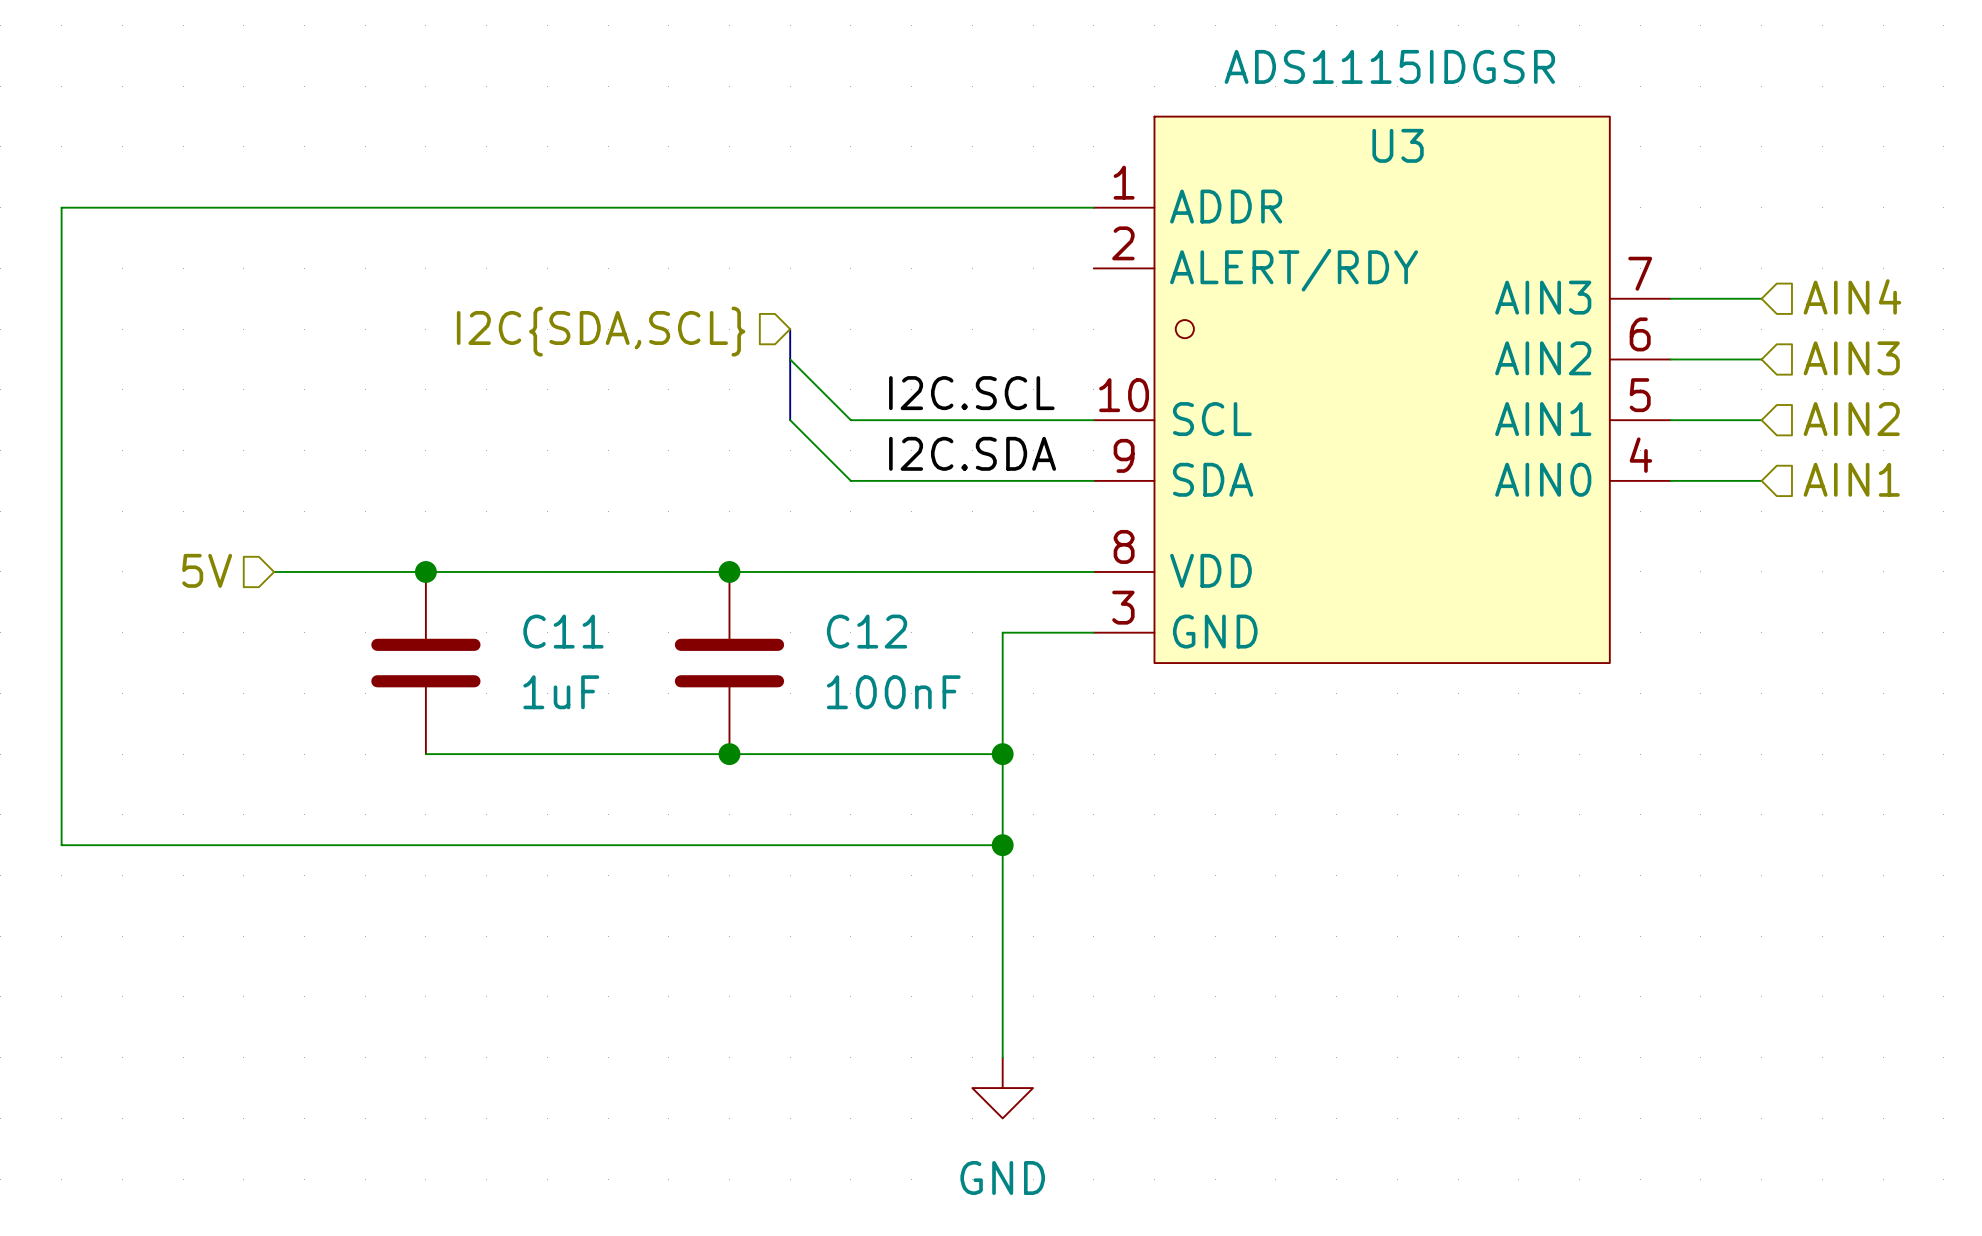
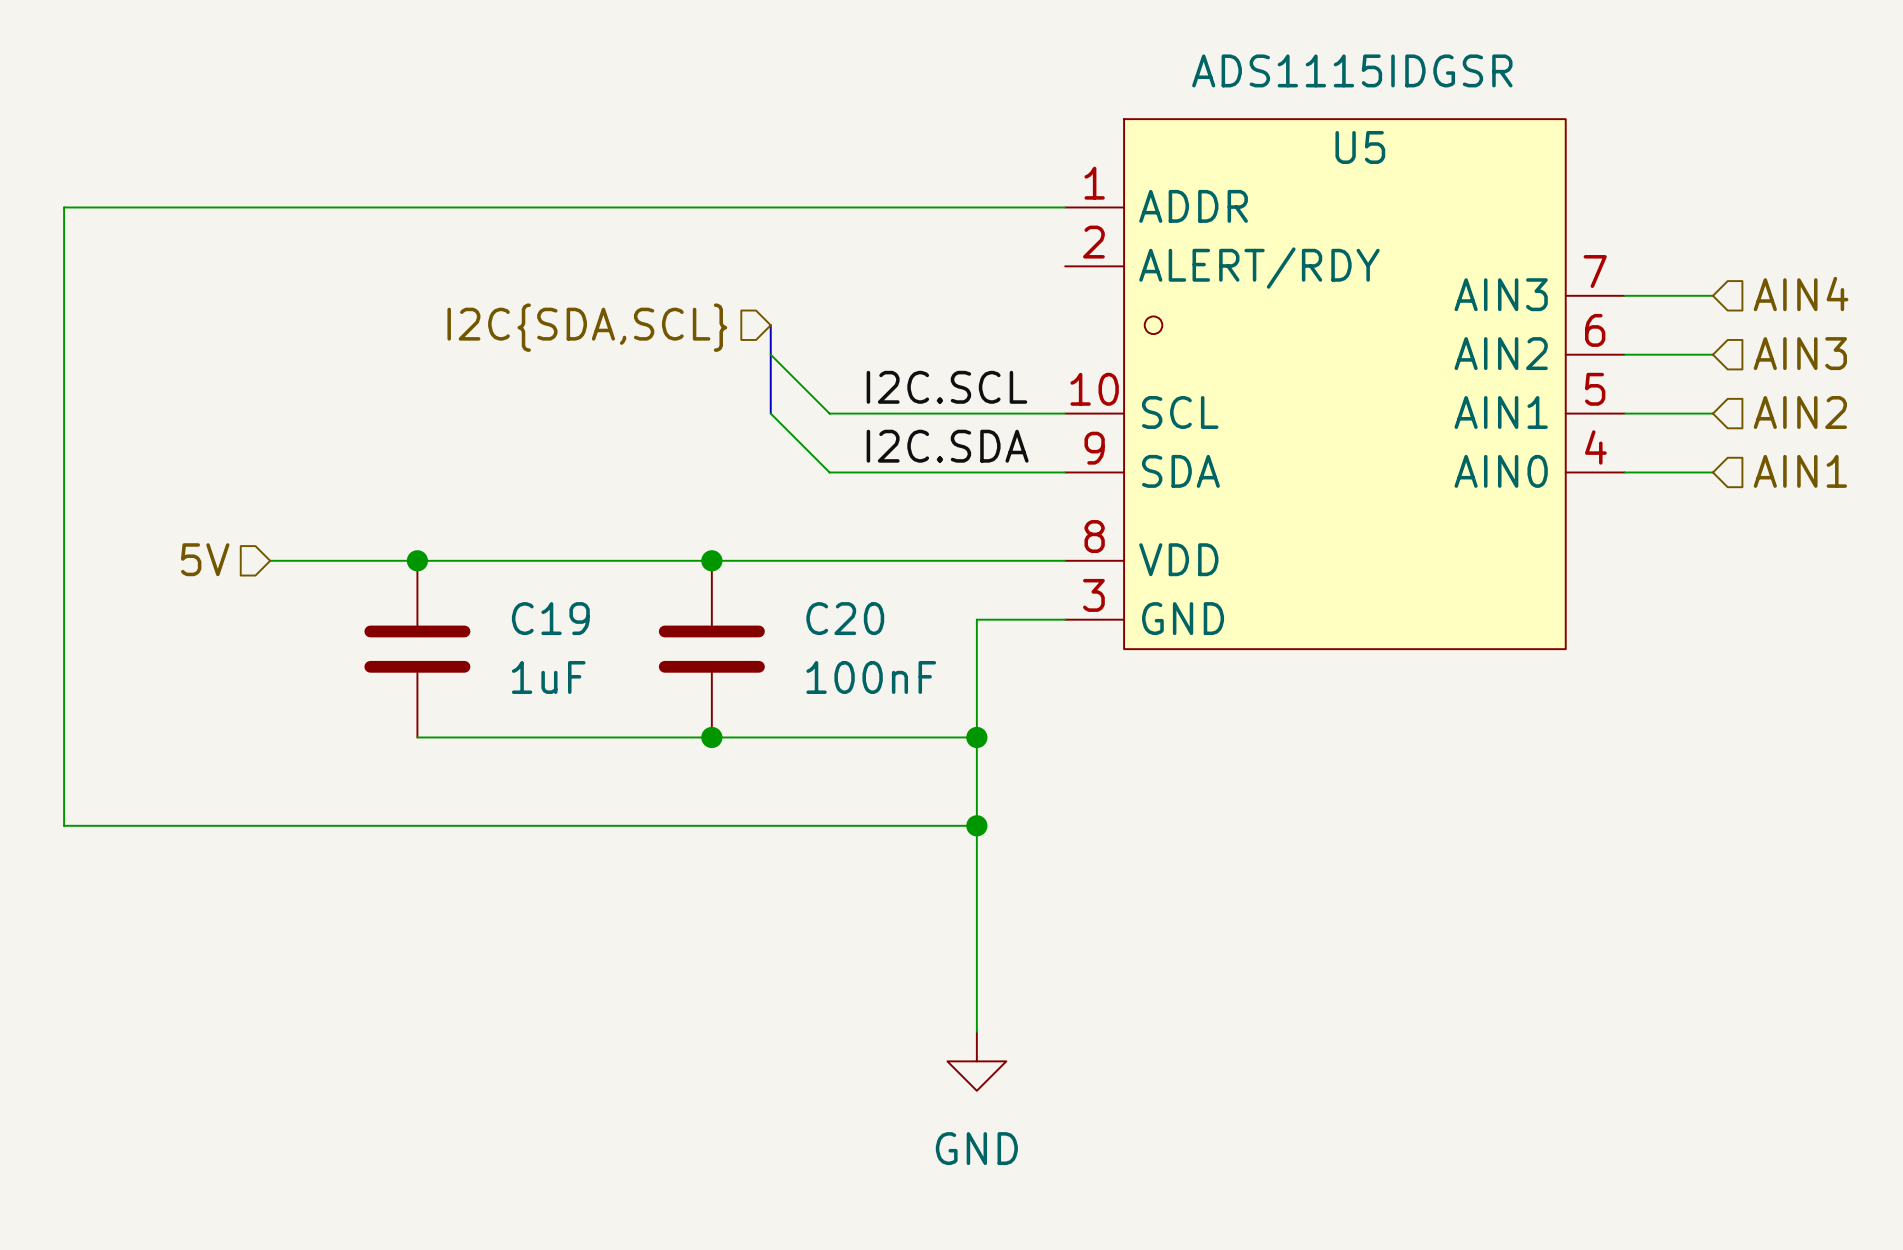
U3 name: U3 (1398, 145) -> U5 (1360, 147)
C11 name: C11 (563, 631) -> C19 (550, 618)
C12 name: C12 (867, 631) -> C20 (845, 618)

